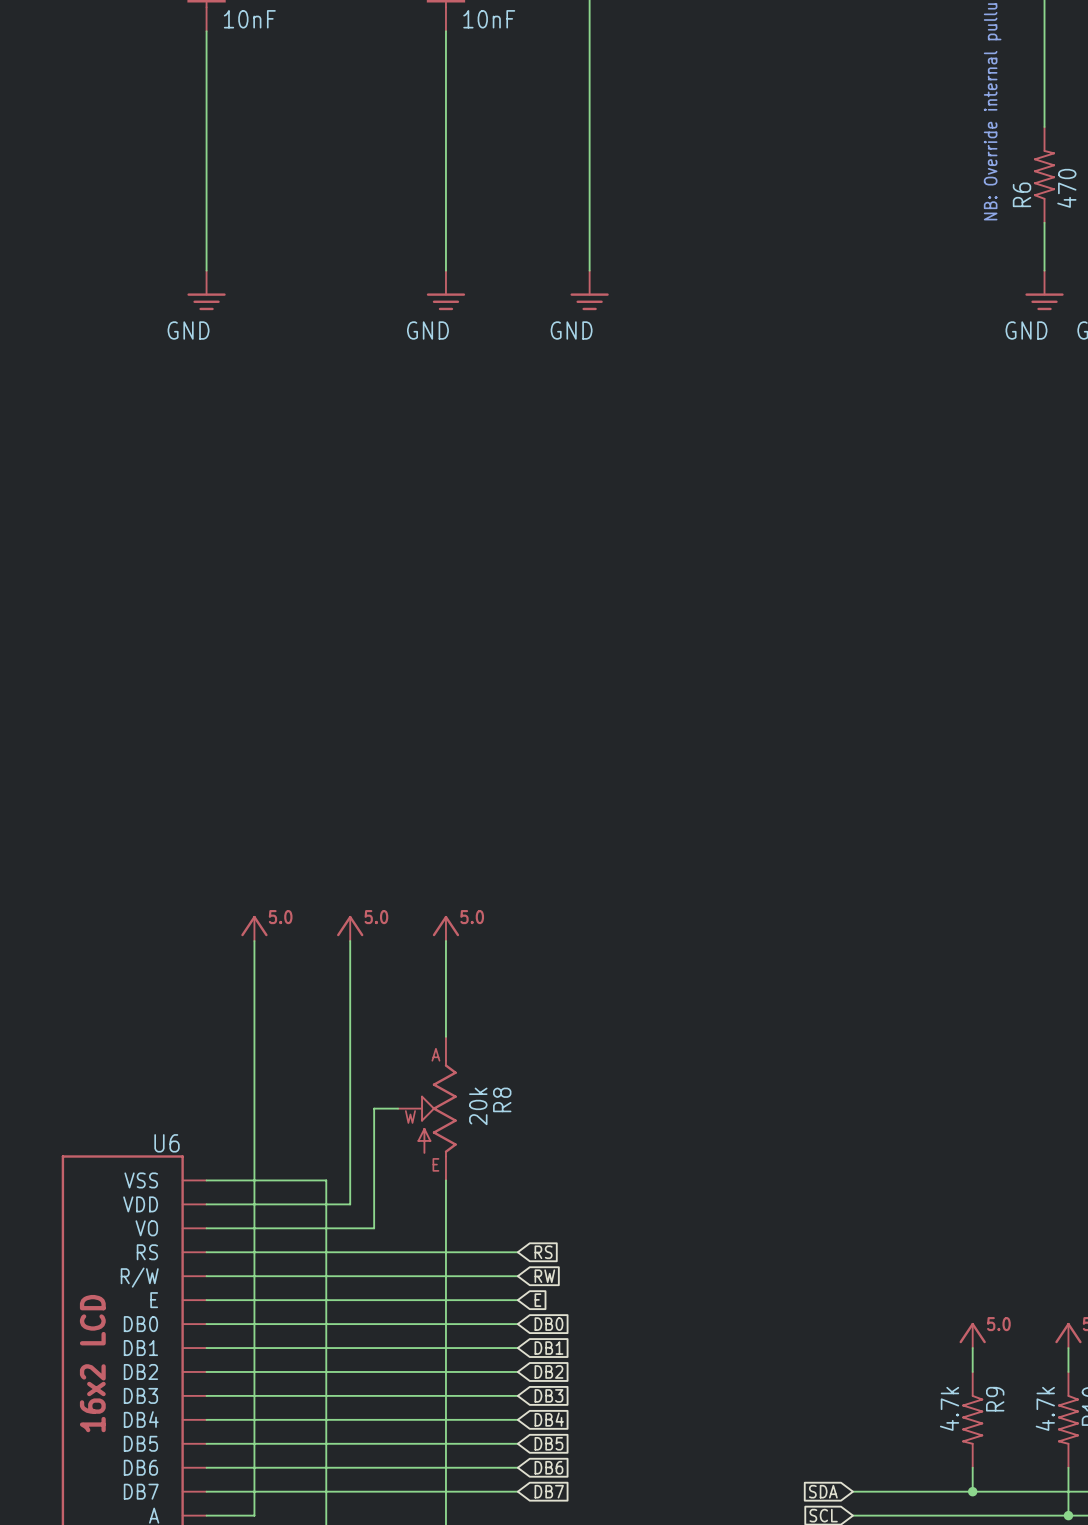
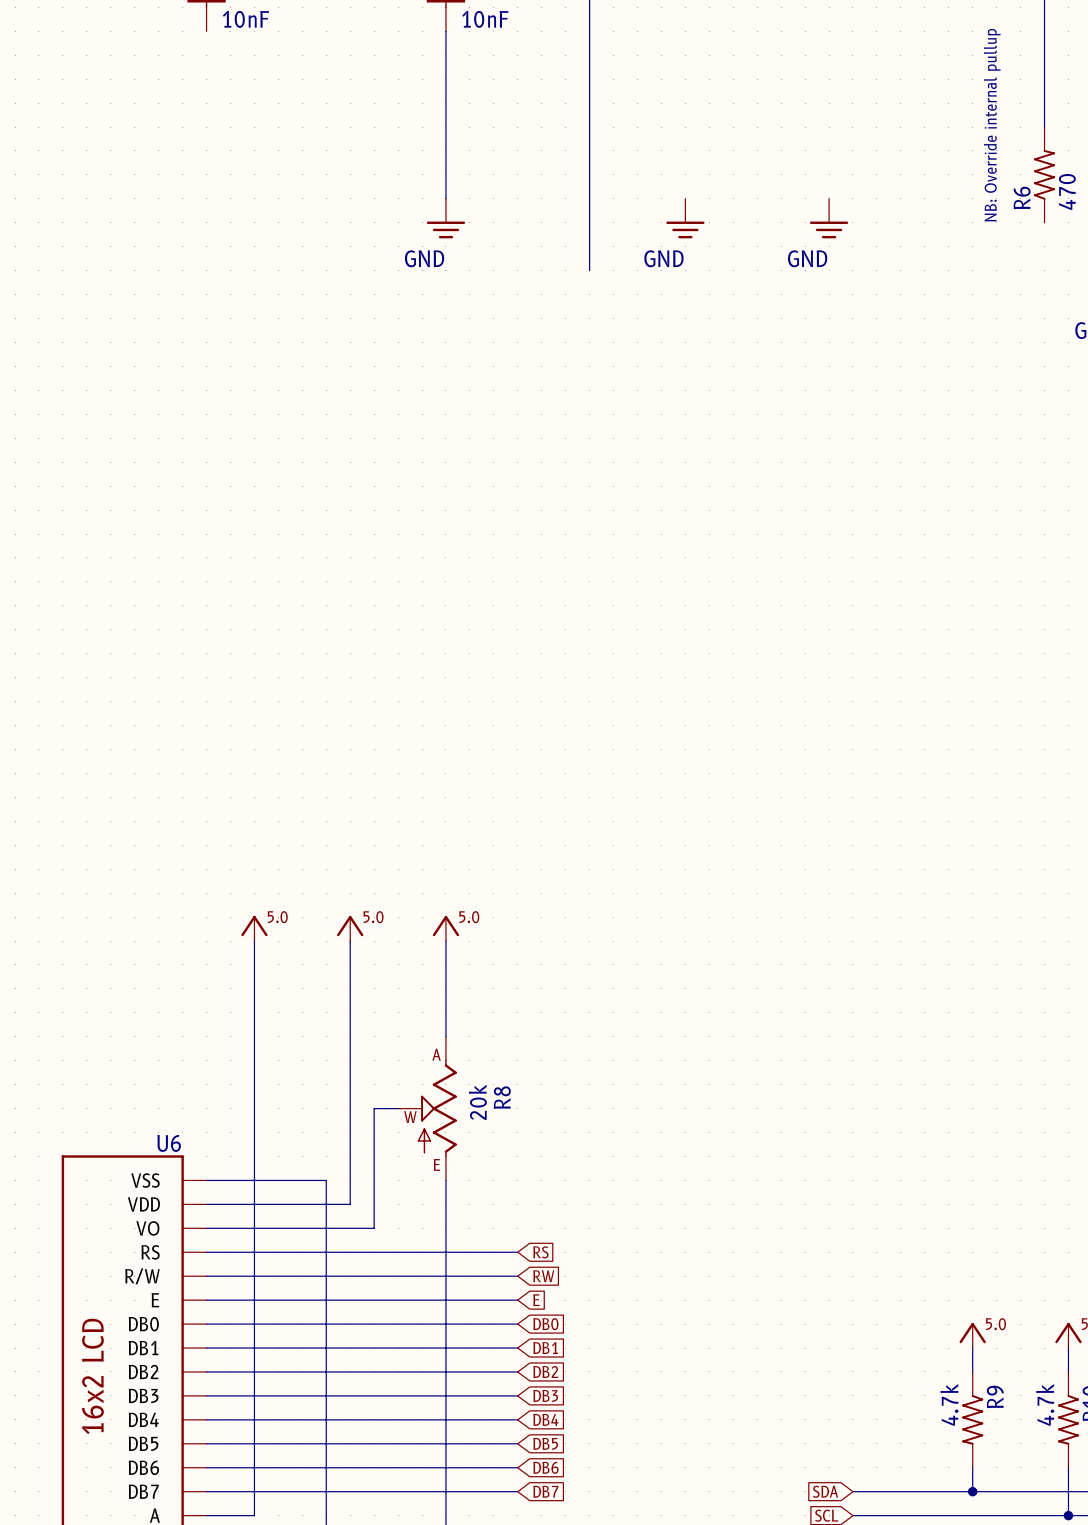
wire: (206, 31) (206, 270) -> none
wire: (445, 198) (445, 270) -> none
power symbol: none -> GND (685, 218)
power symbol: none -> GND (829, 218)
wire: (1044, 222) (1044, 270) -> none
power symbol: GND (206, 290) -> none
power symbol position: GND (445, 290) -> GND (445, 218)
power symbol: GND (589, 290) -> none
power symbol: GND (1044, 290) -> none

